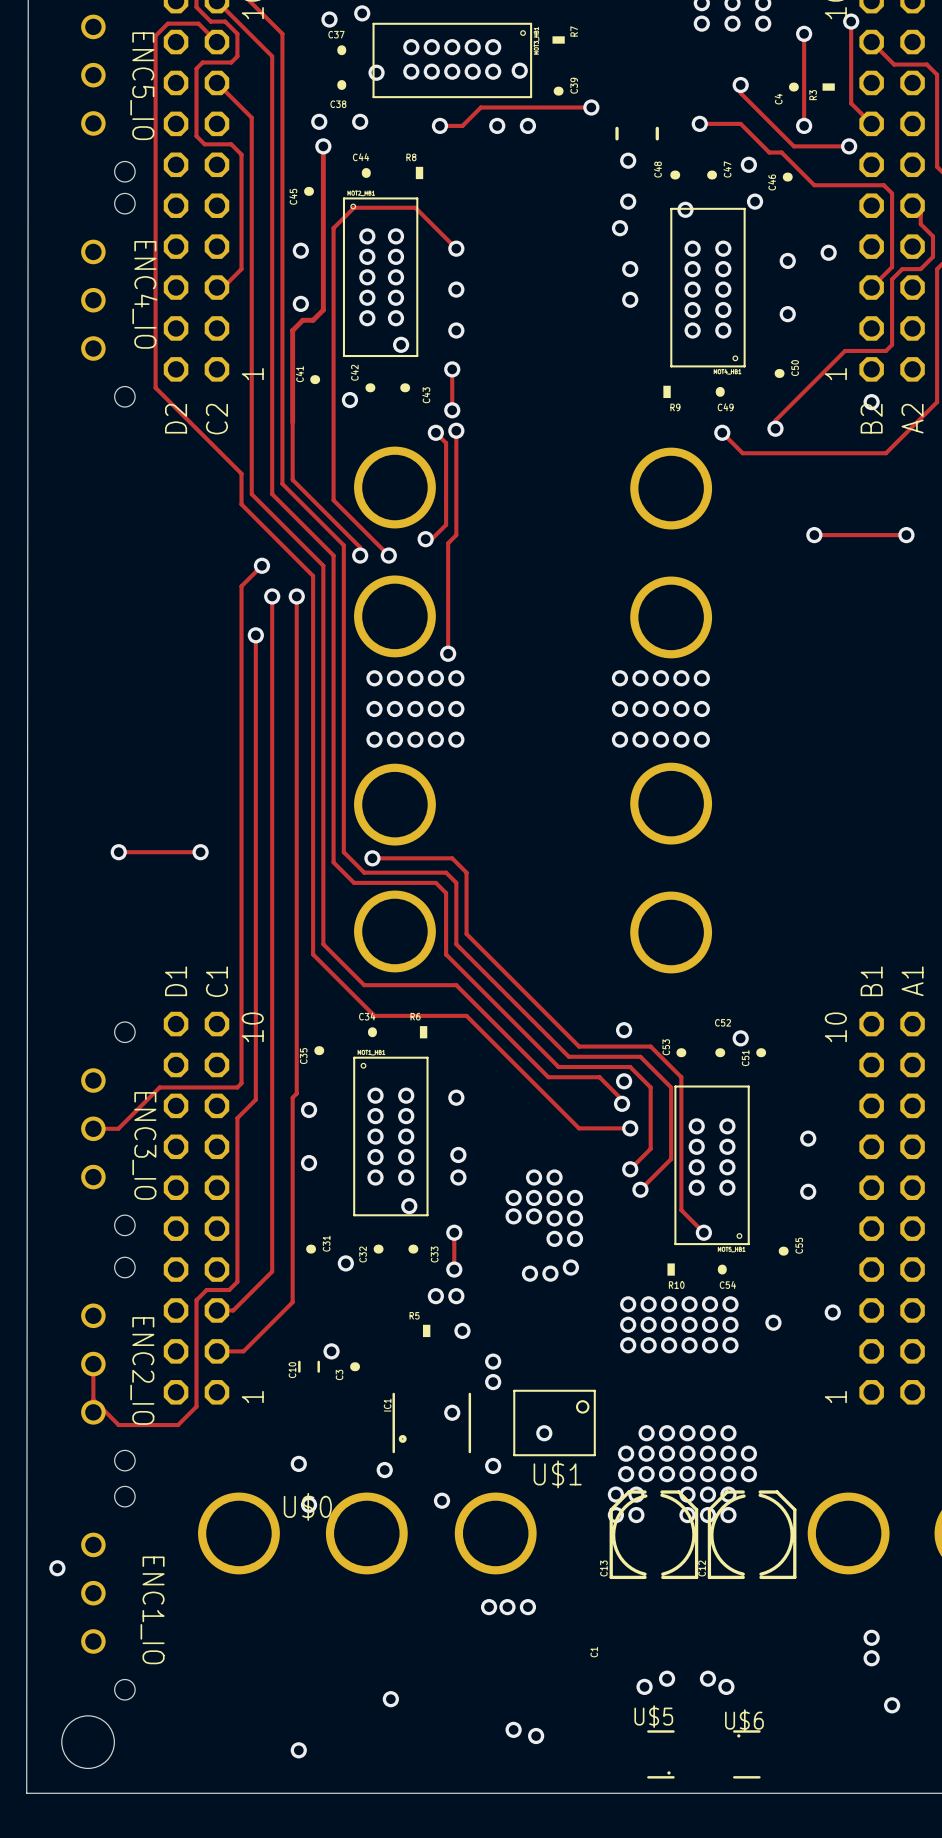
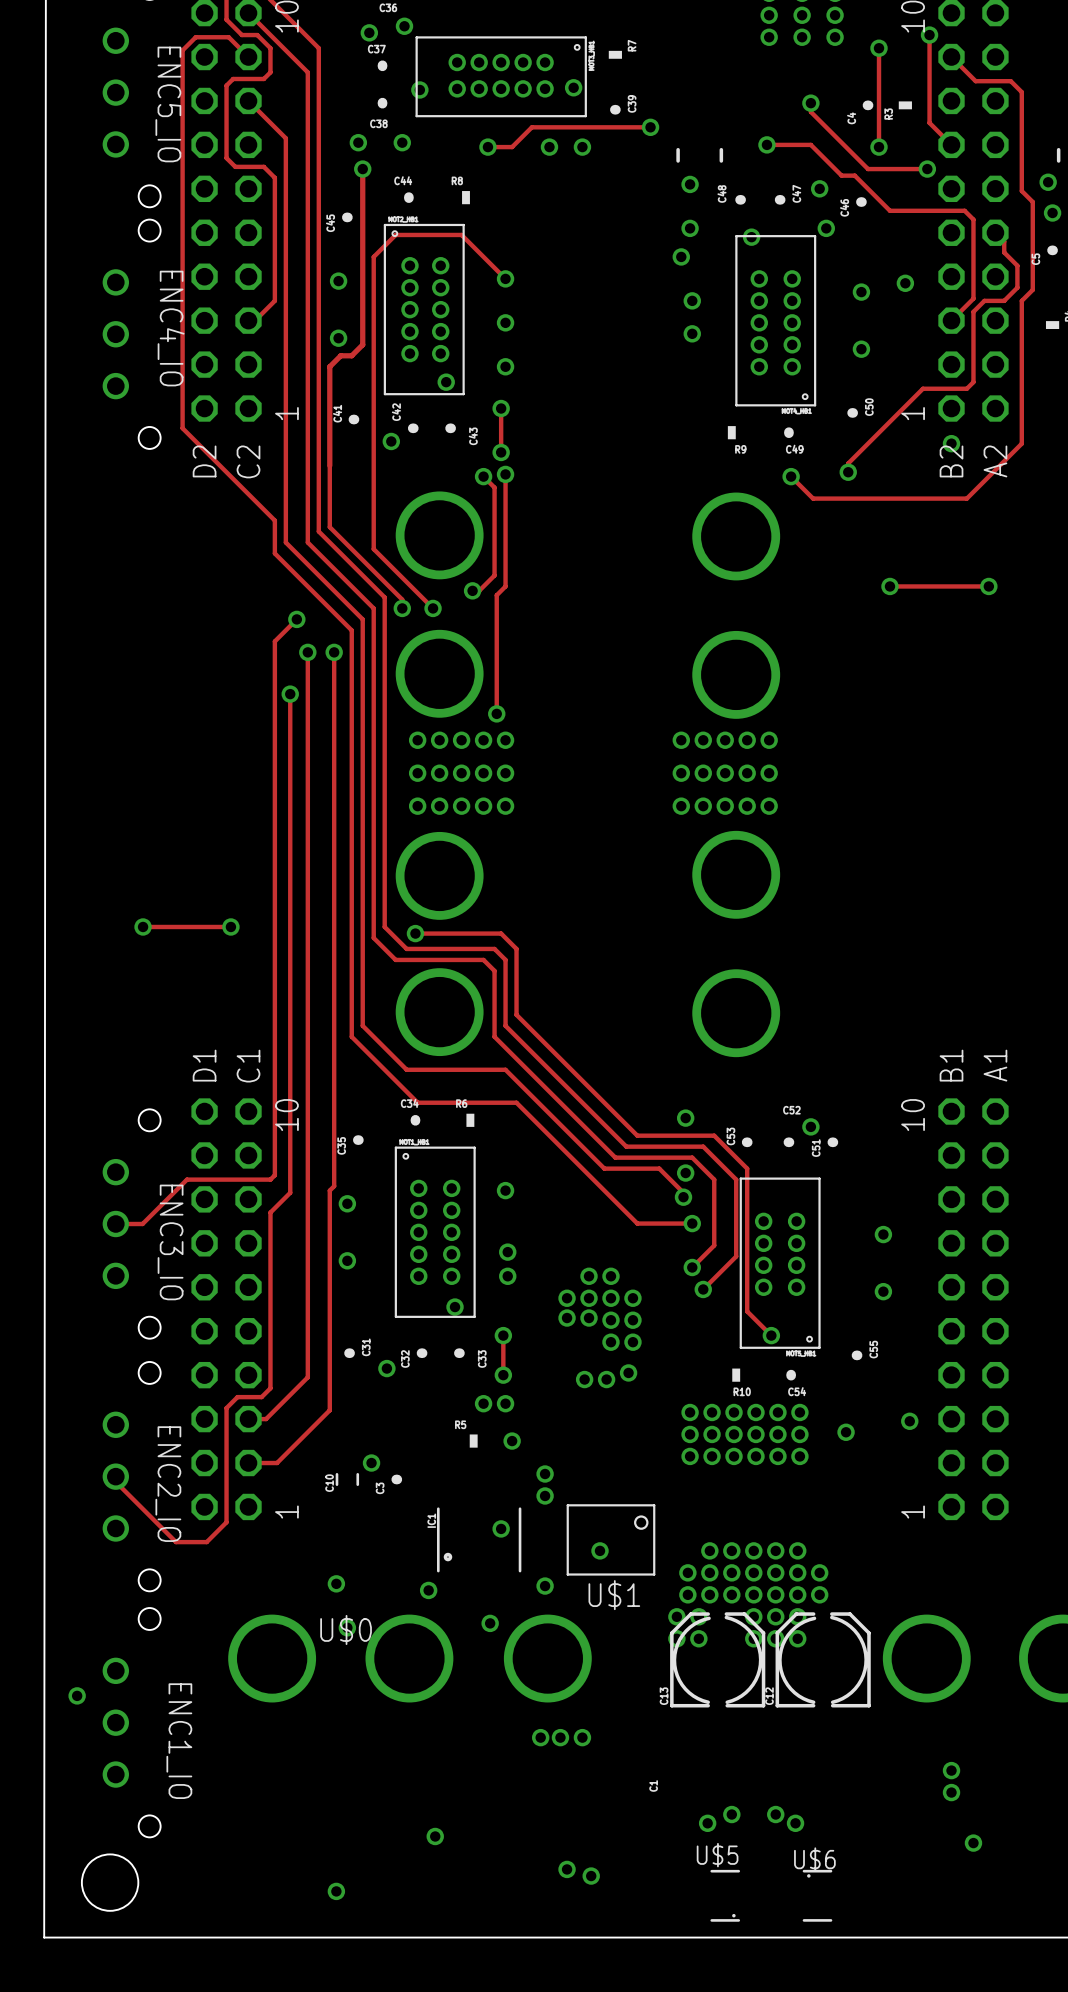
track: (93, 1368) (93, 1399) (118, 1425) (149, 1425) -> (115, 1481) (176, 1542)

